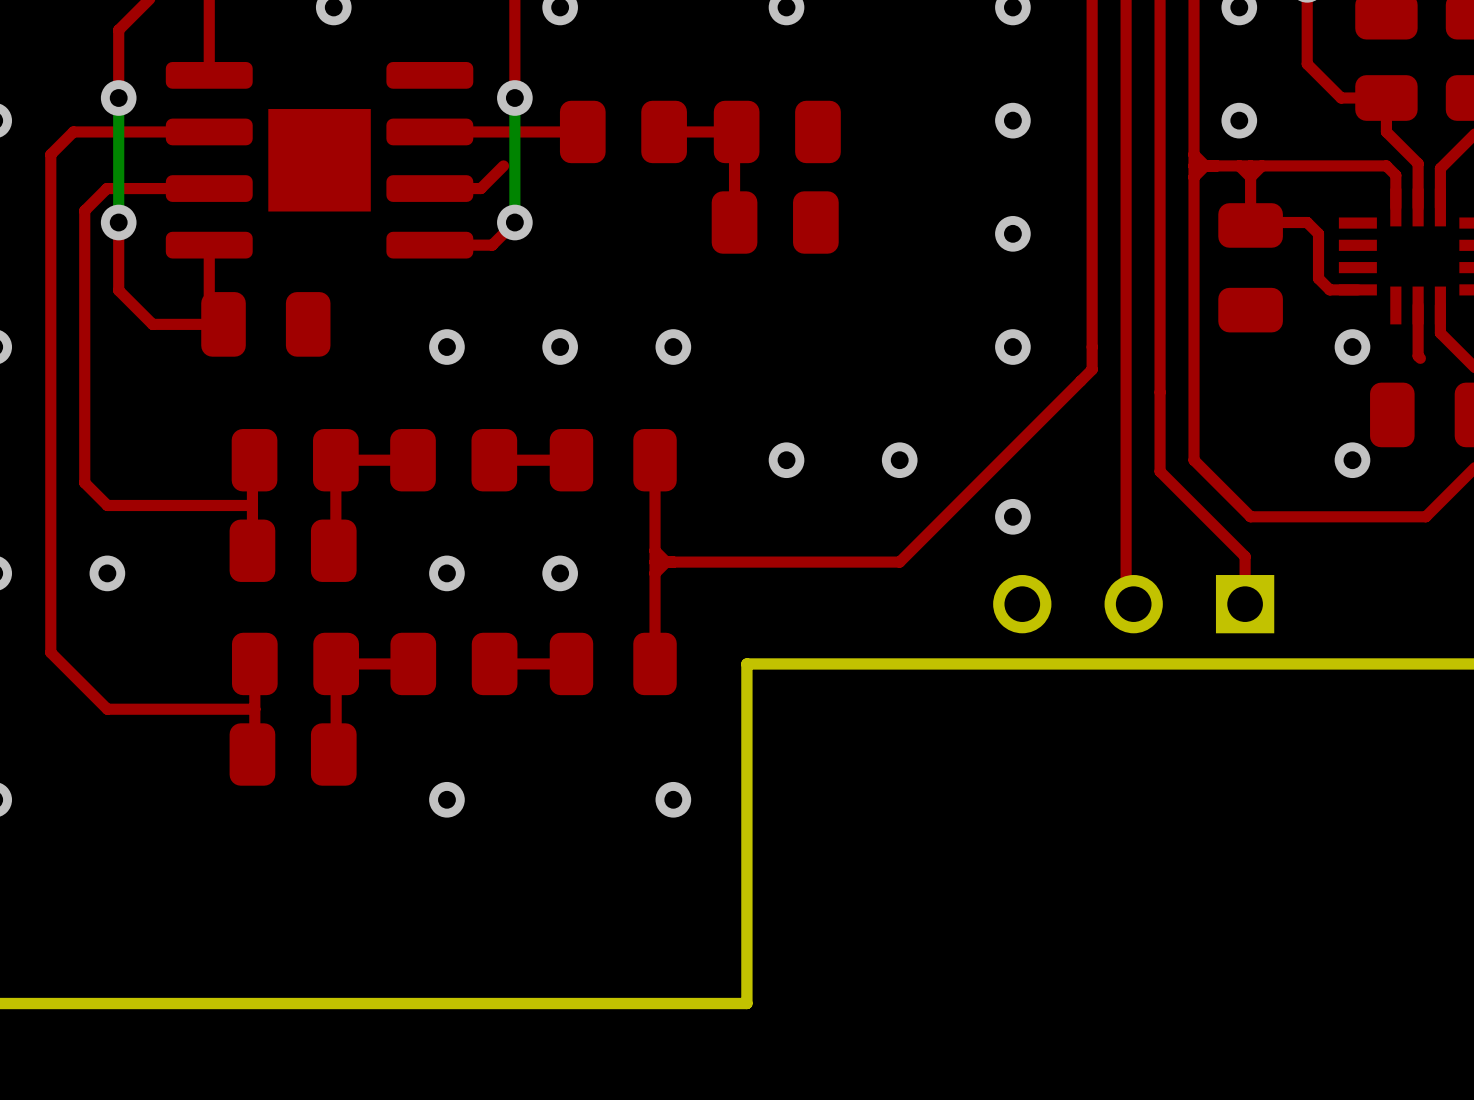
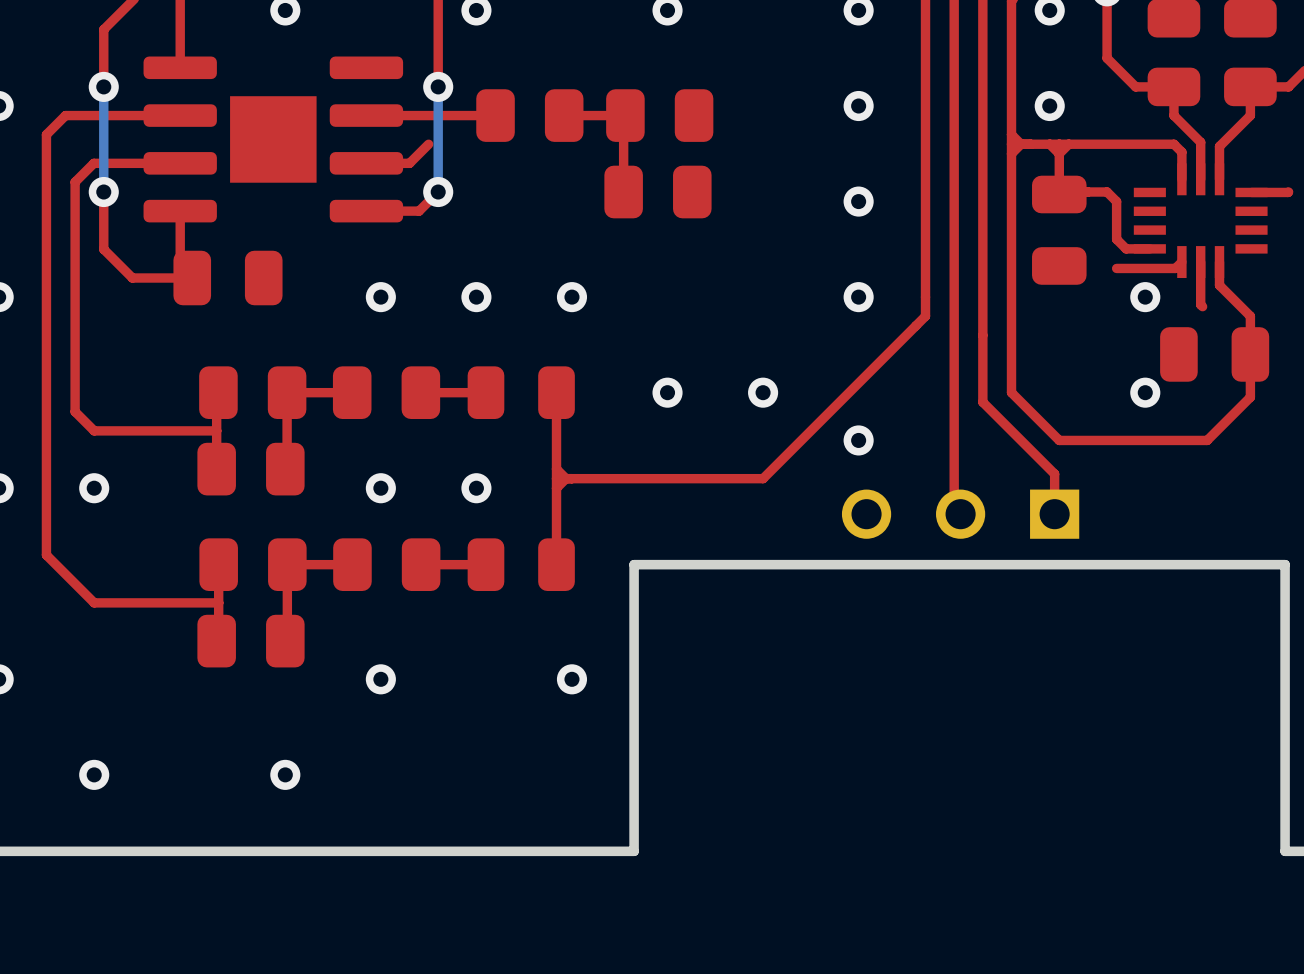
top track: none -> (1181, 262) (1175, 268) (1116, 268)
via: none -> (94, 774)
via: none -> (285, 774)

